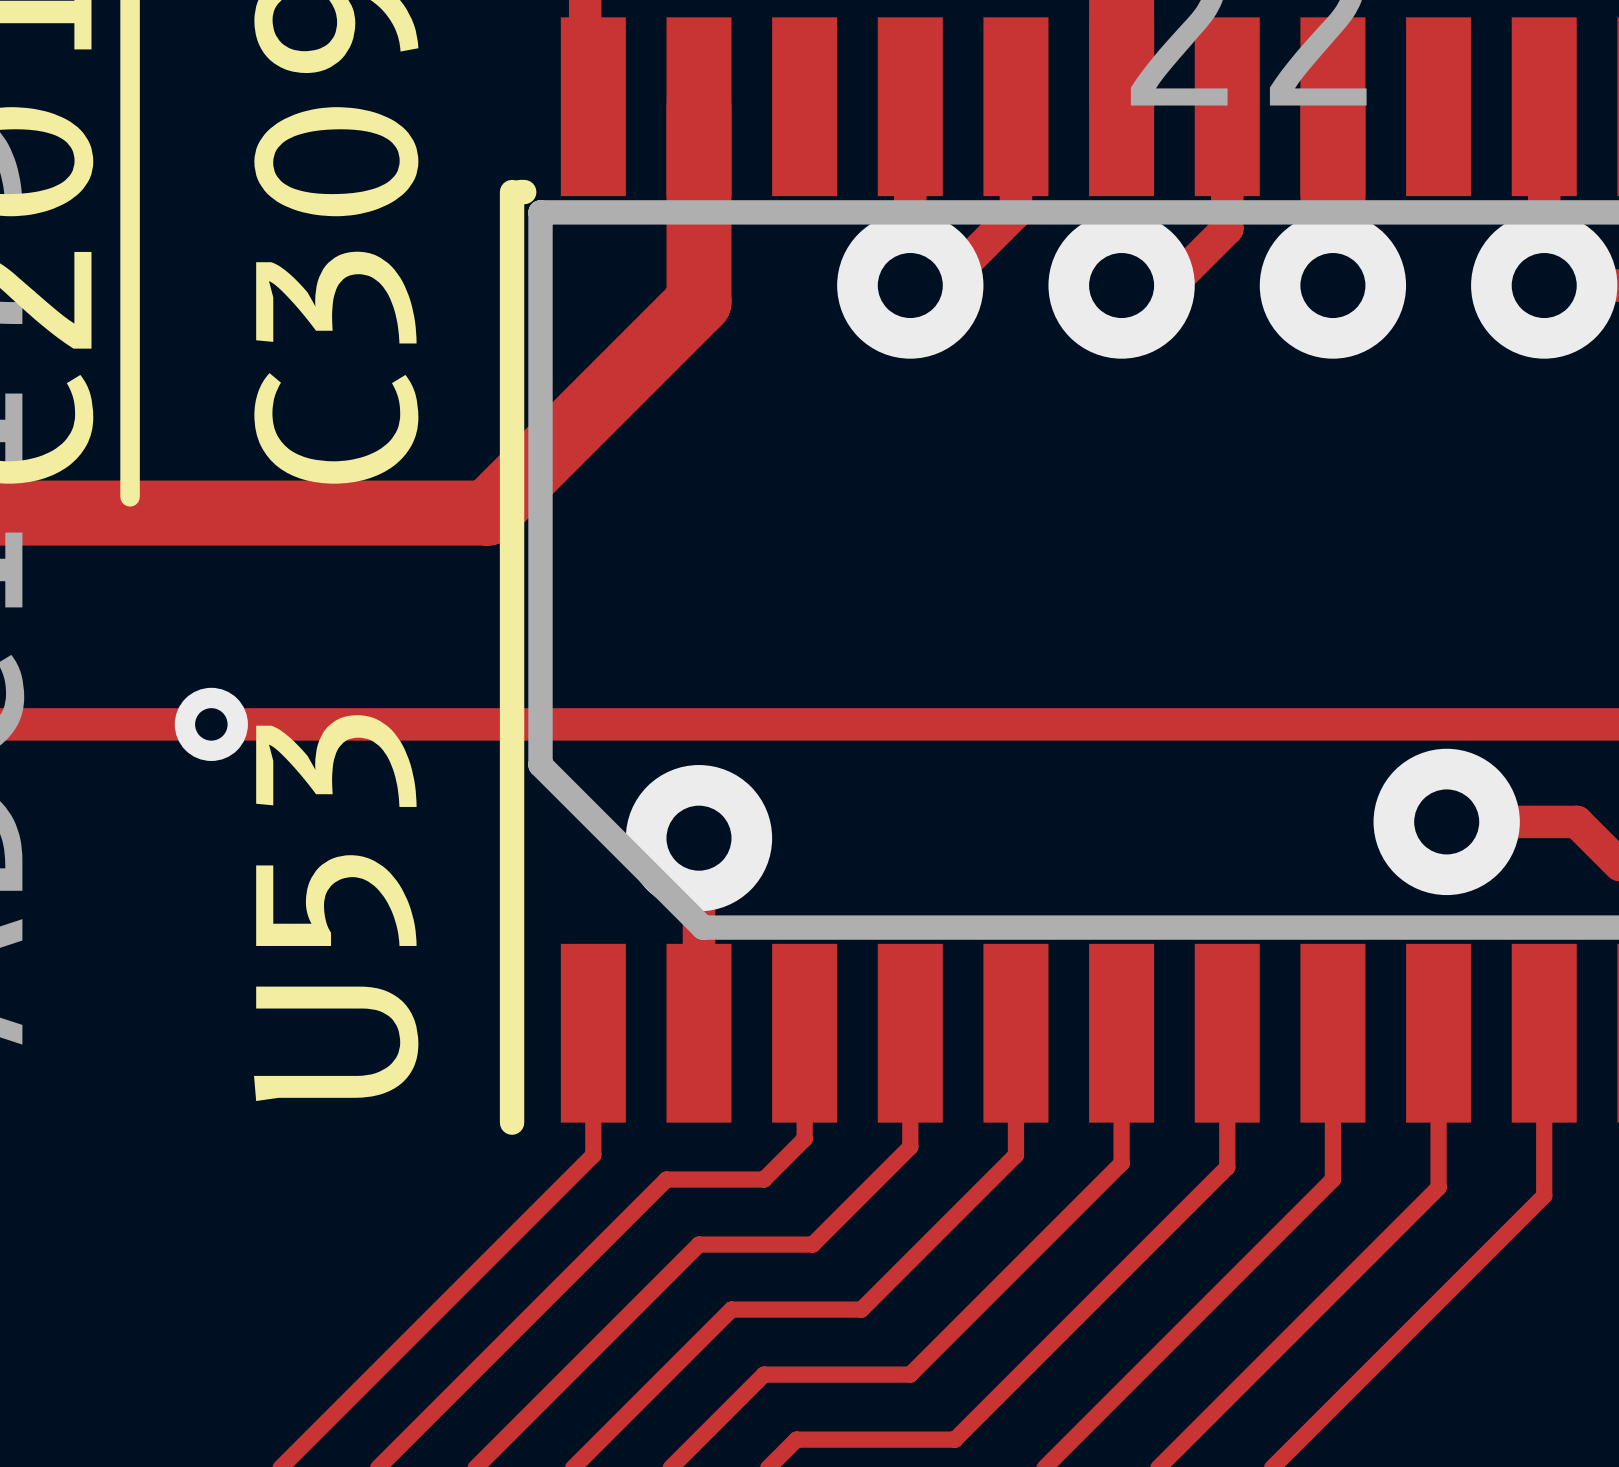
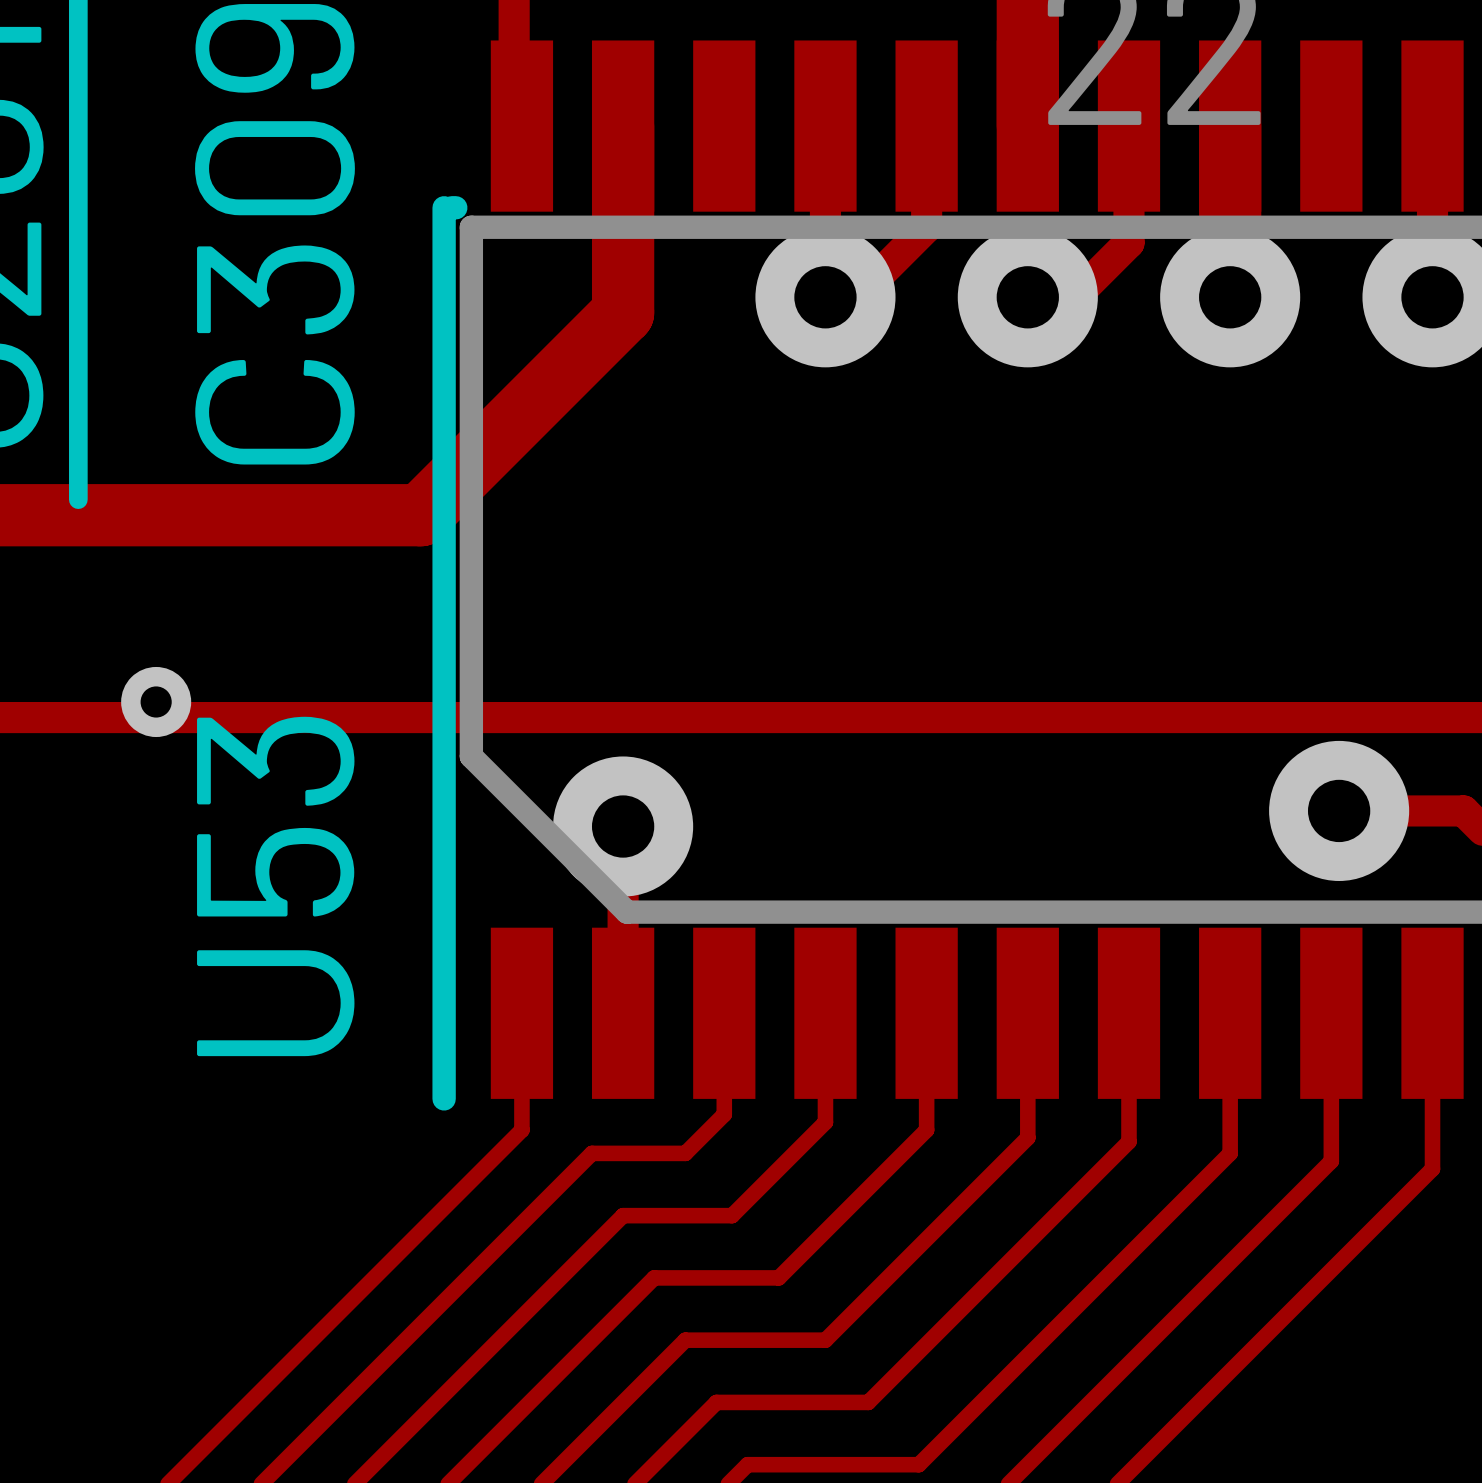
via position: (211, 724) -> (156, 701)

